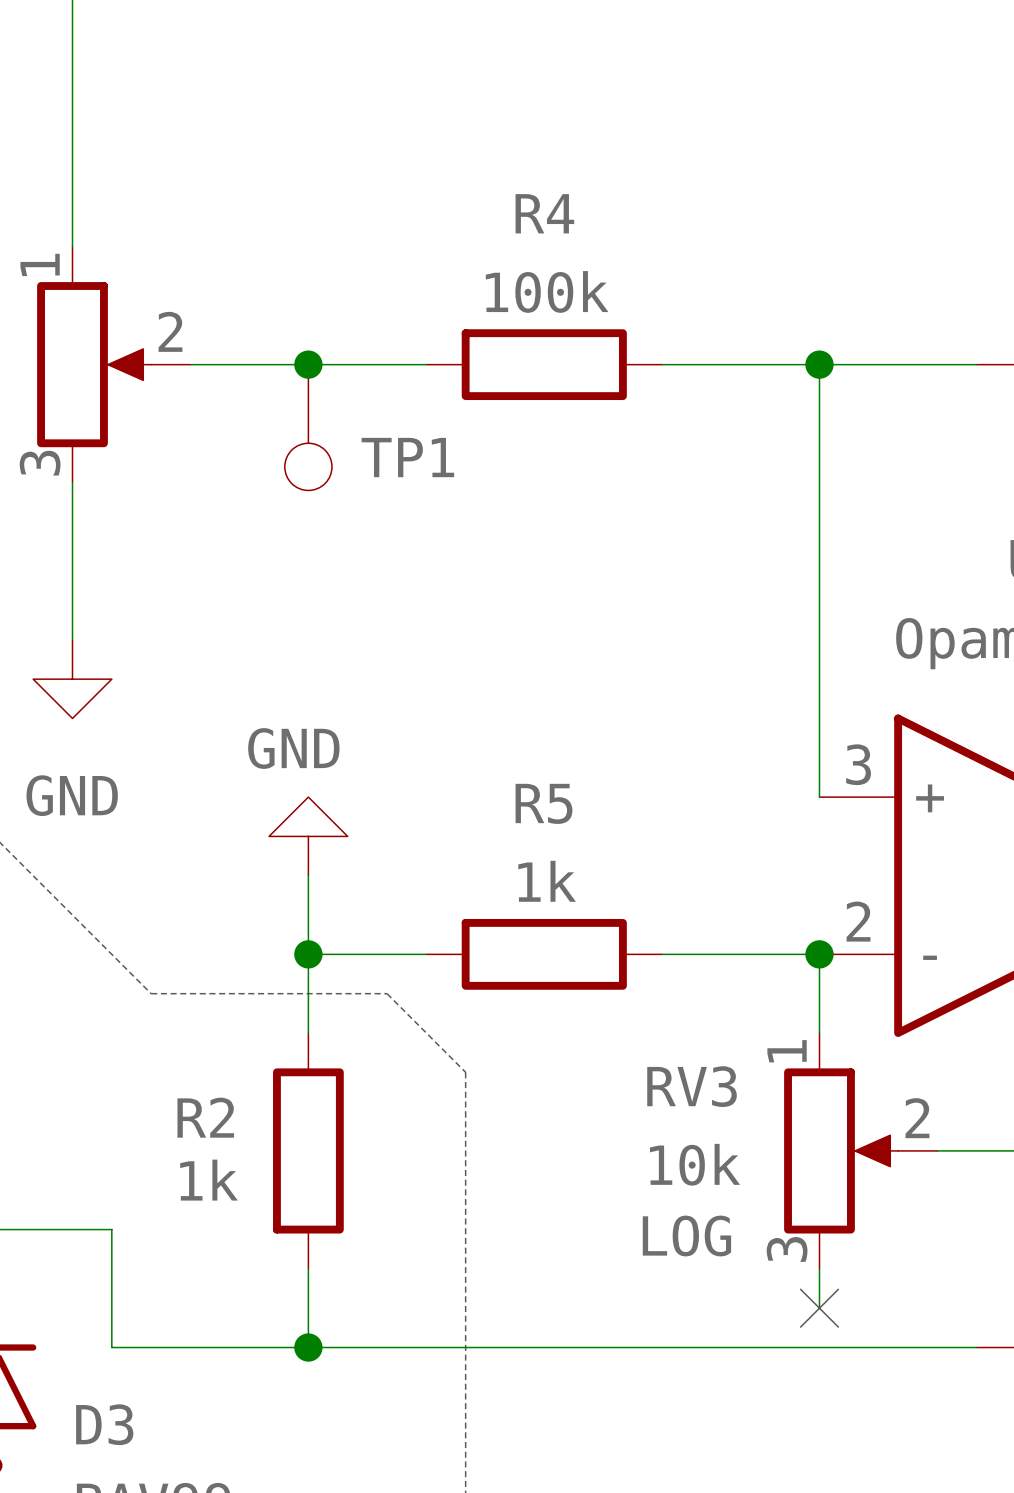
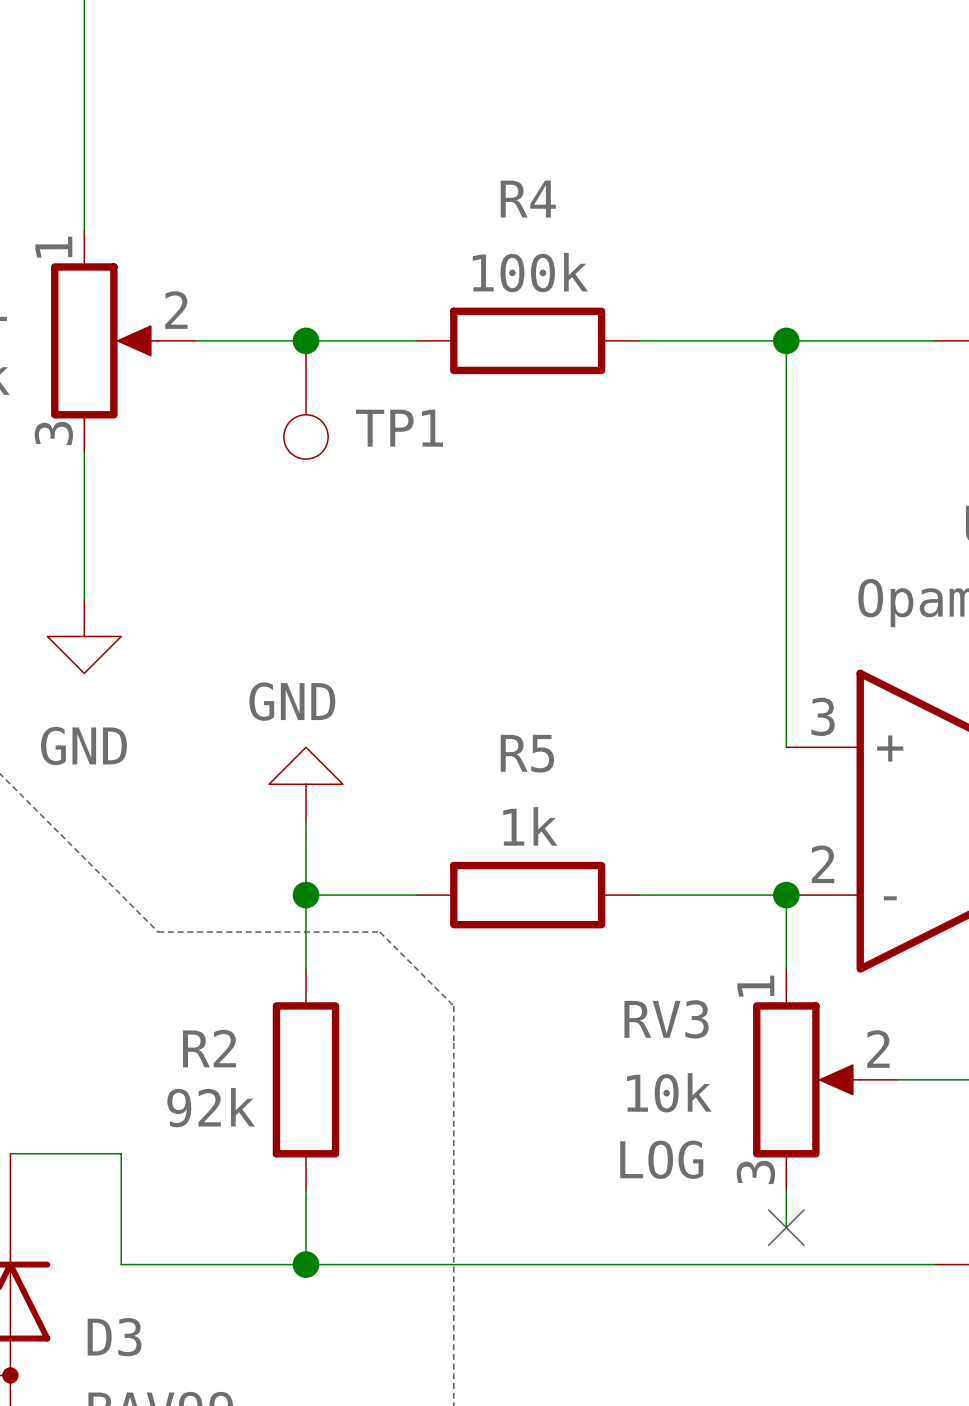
R2 value: 1k (209, 1180) -> 92k (211, 1107)

